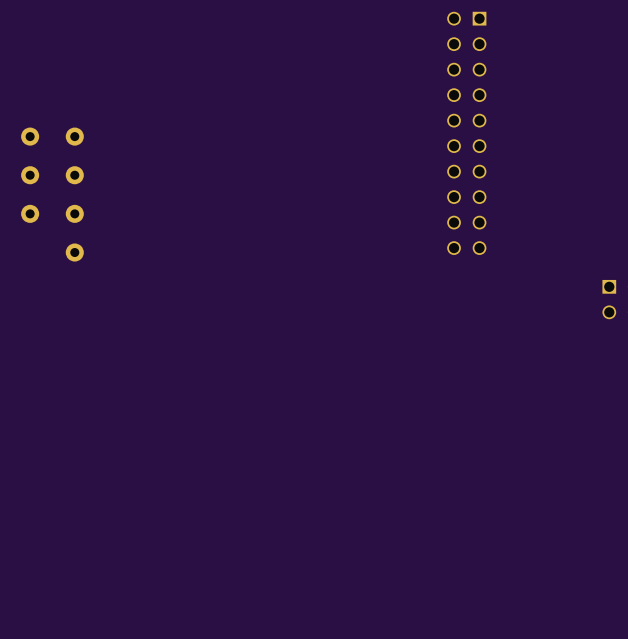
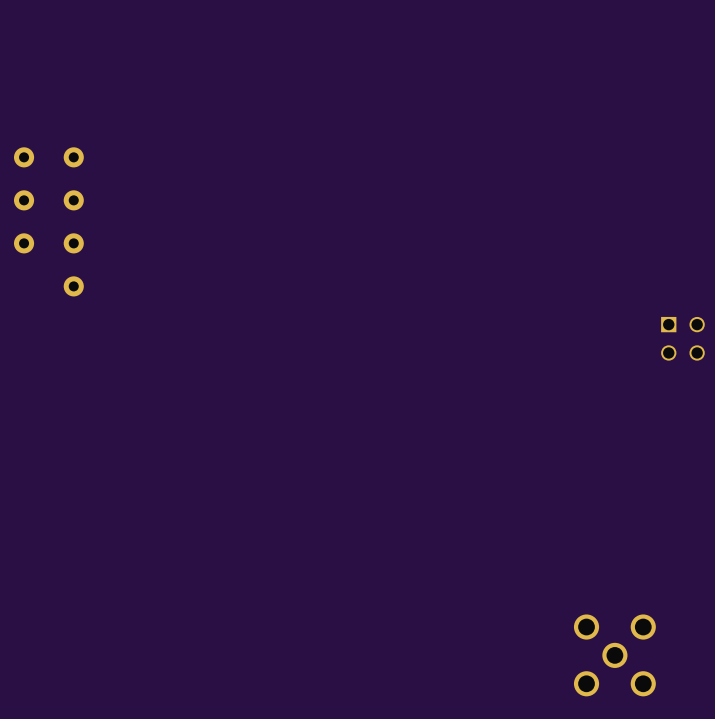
part: (466, 133) -> none
part: none -> (614, 655)

